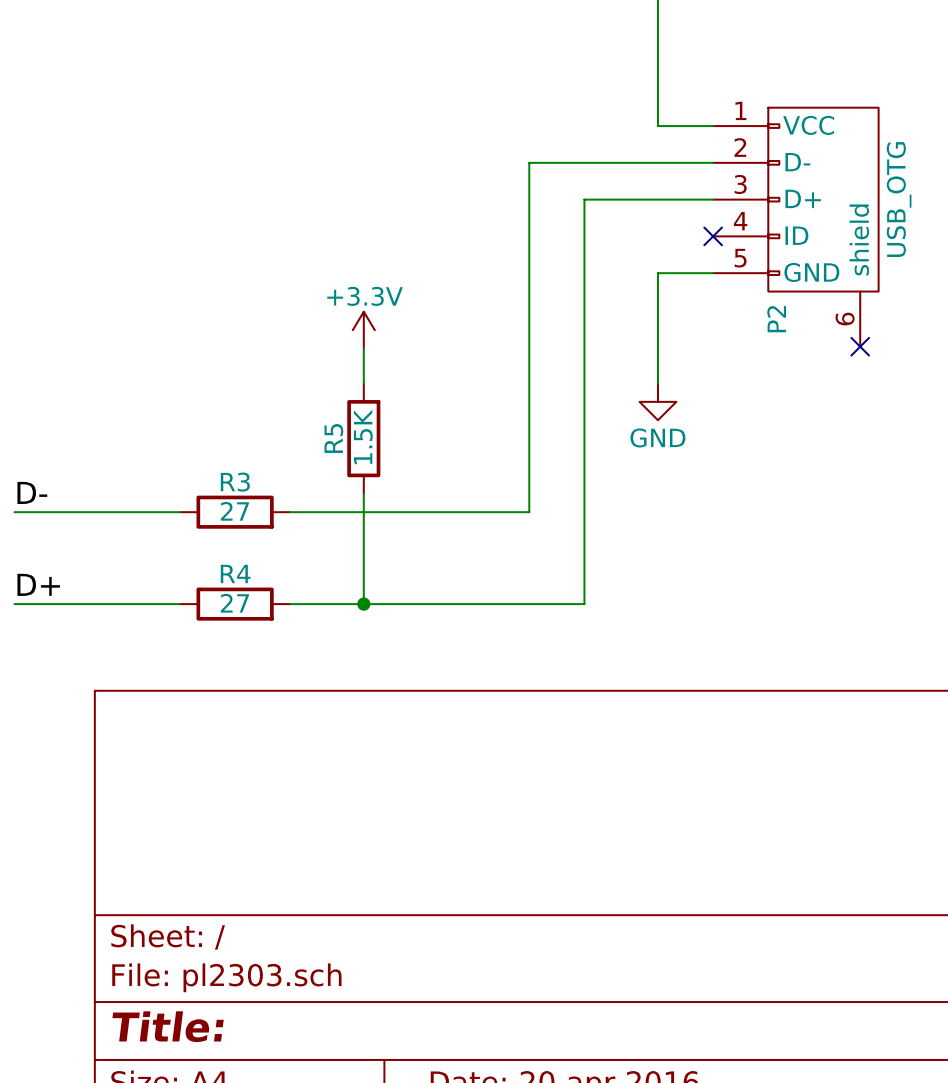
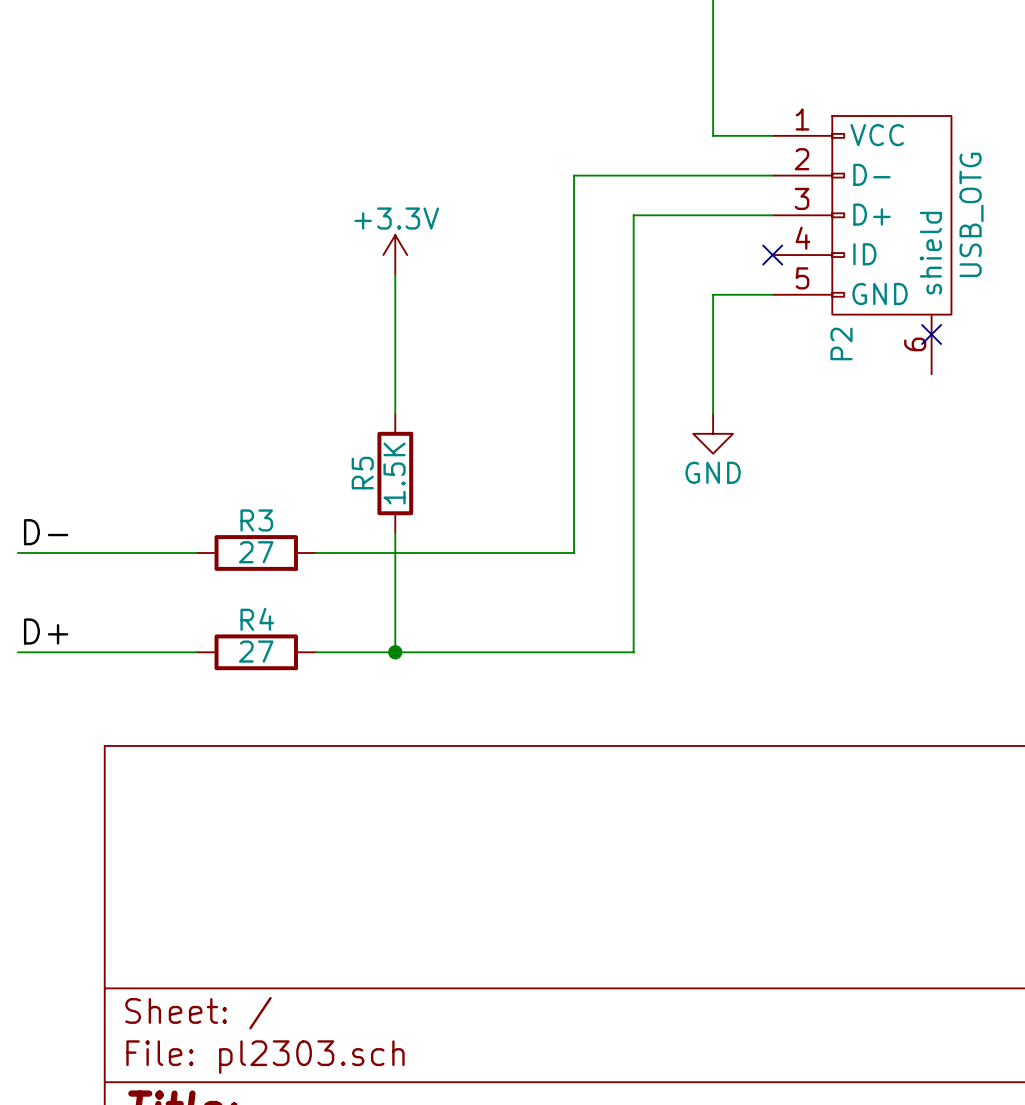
wire: none -> (395, 274) (395, 376)
power symbol position: +3.3V (363, 330) -> +3.3V (395, 255)
no-connect mark position: (860, 346) -> (931, 334)

